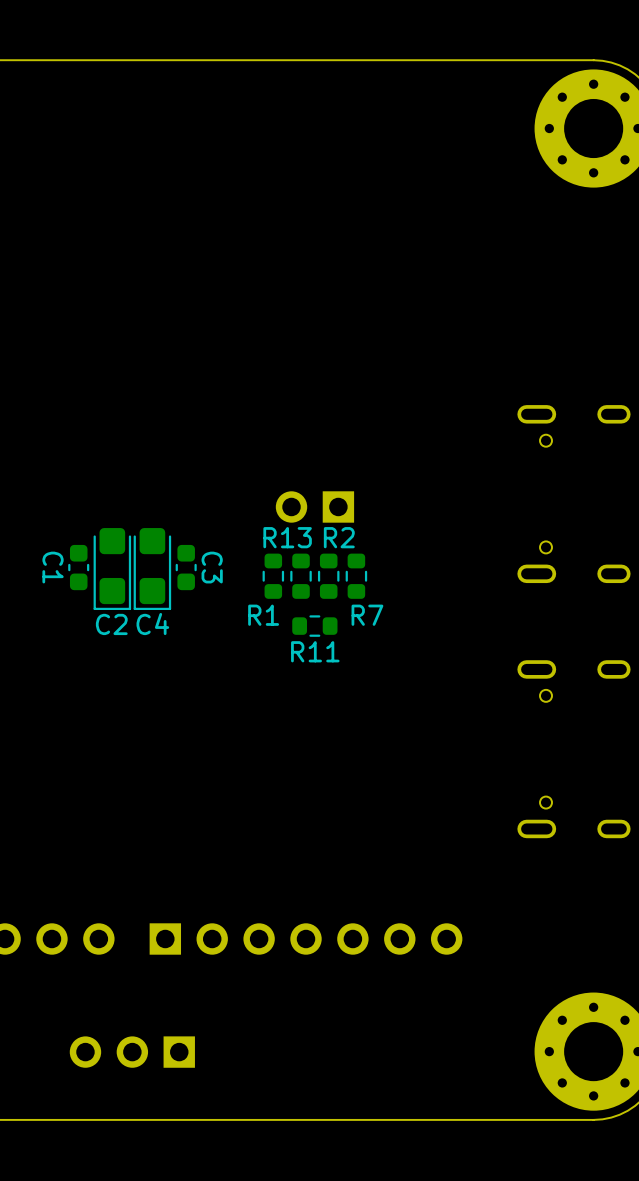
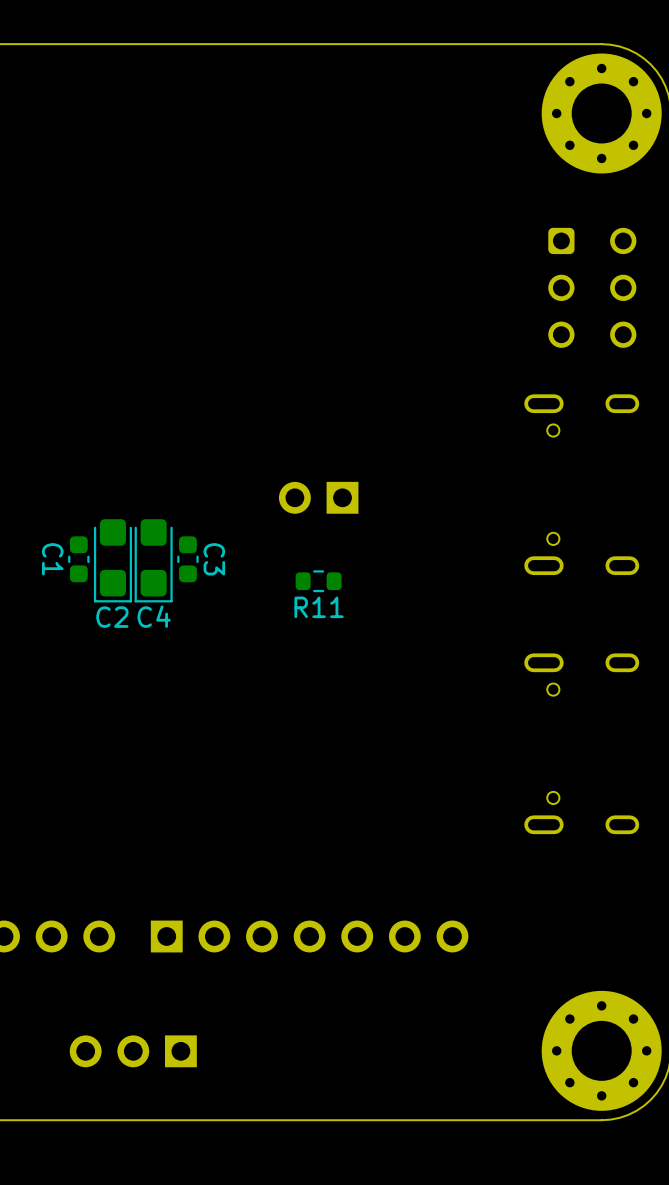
part: none -> (592, 287)
R1: (273, 576) -> none
R13: (301, 576) -> none
R2: (328, 576) -> none
R7: (356, 576) -> none
R11 position: (314, 626) -> (318, 581)

